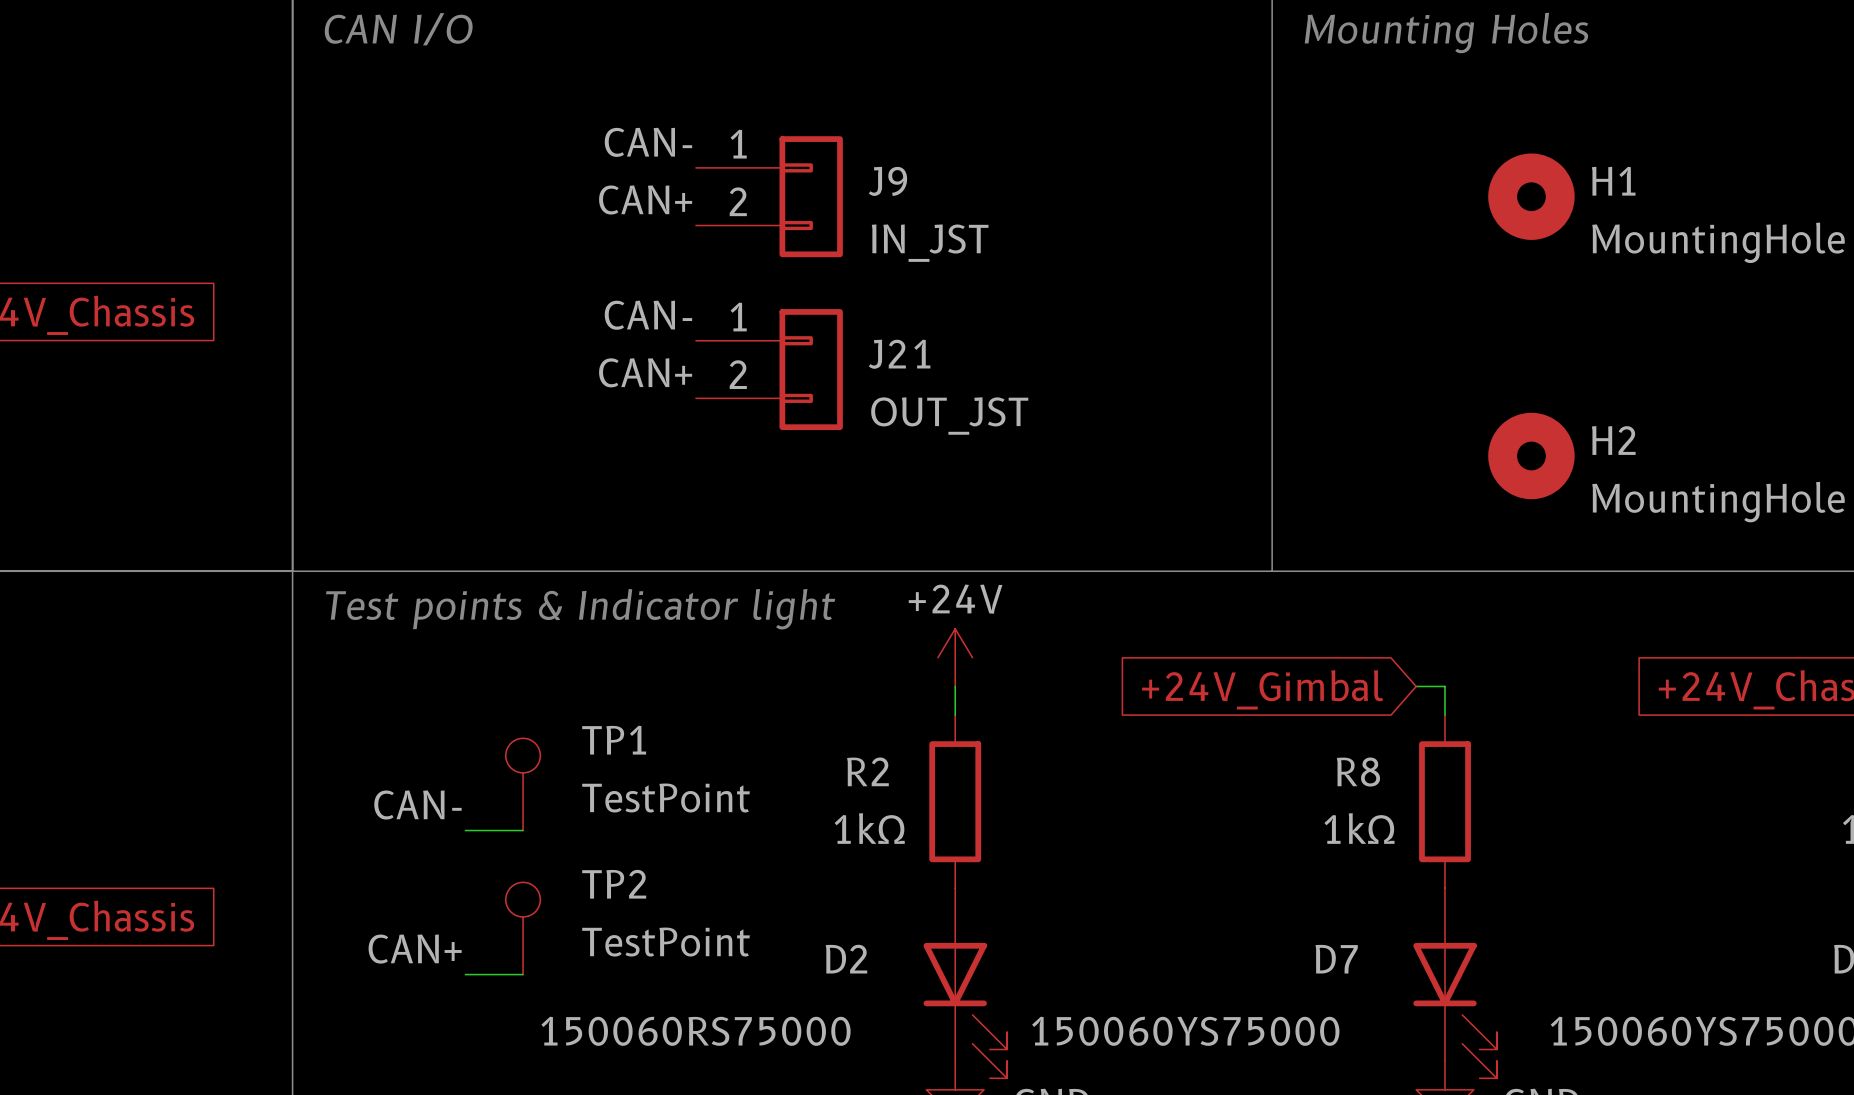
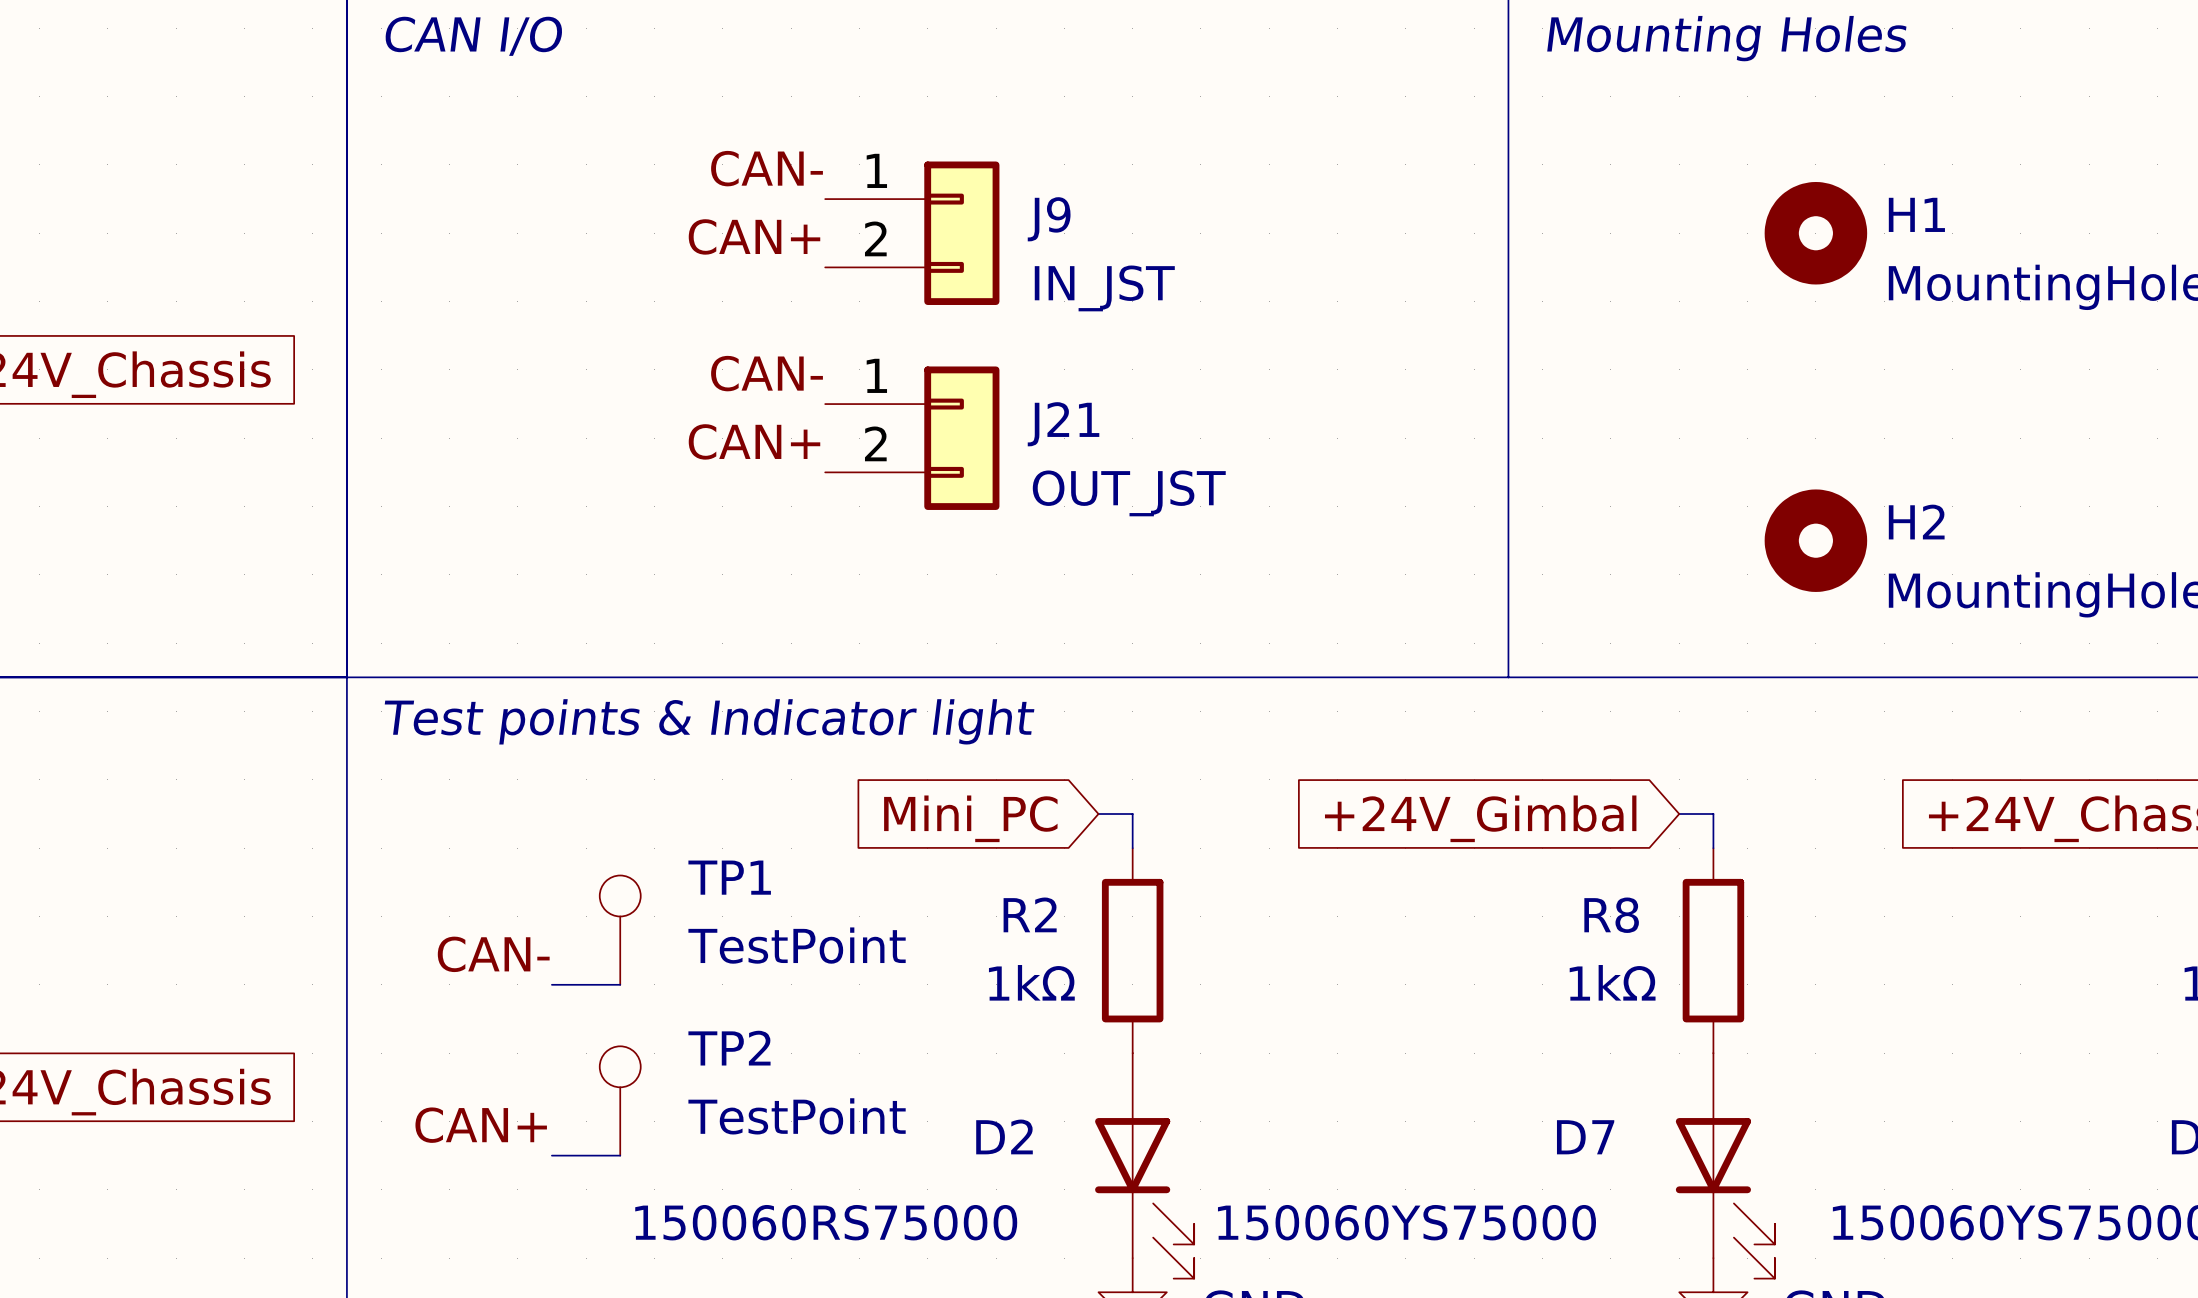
power symbol: +24V (955, 657) -> none
wire: none -> (1098, 814) (1132, 814)
global label: none -> Mini_PC (970, 818)

